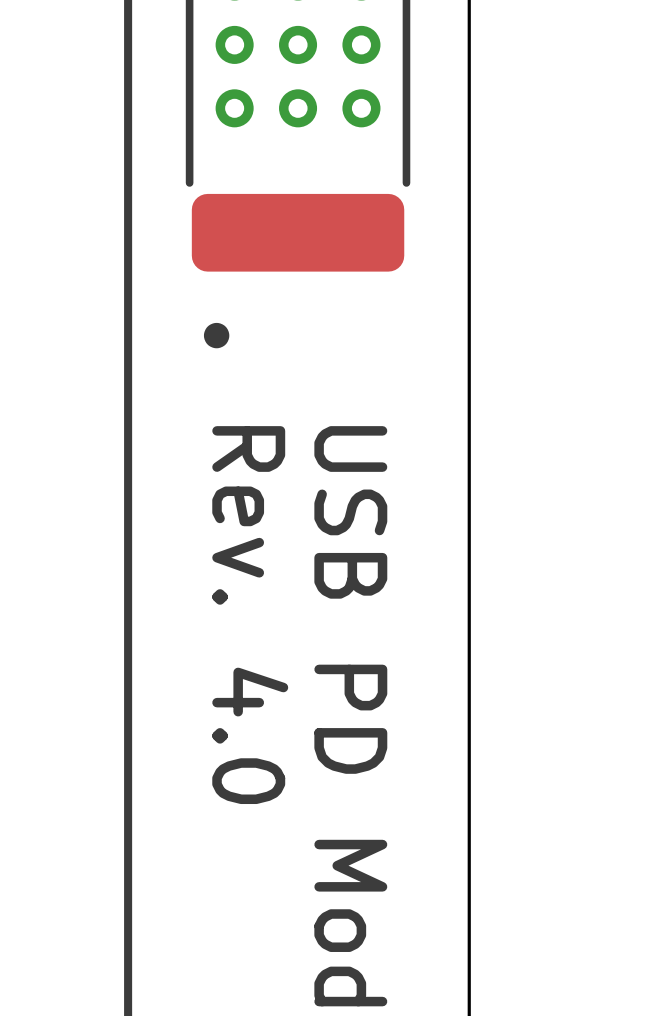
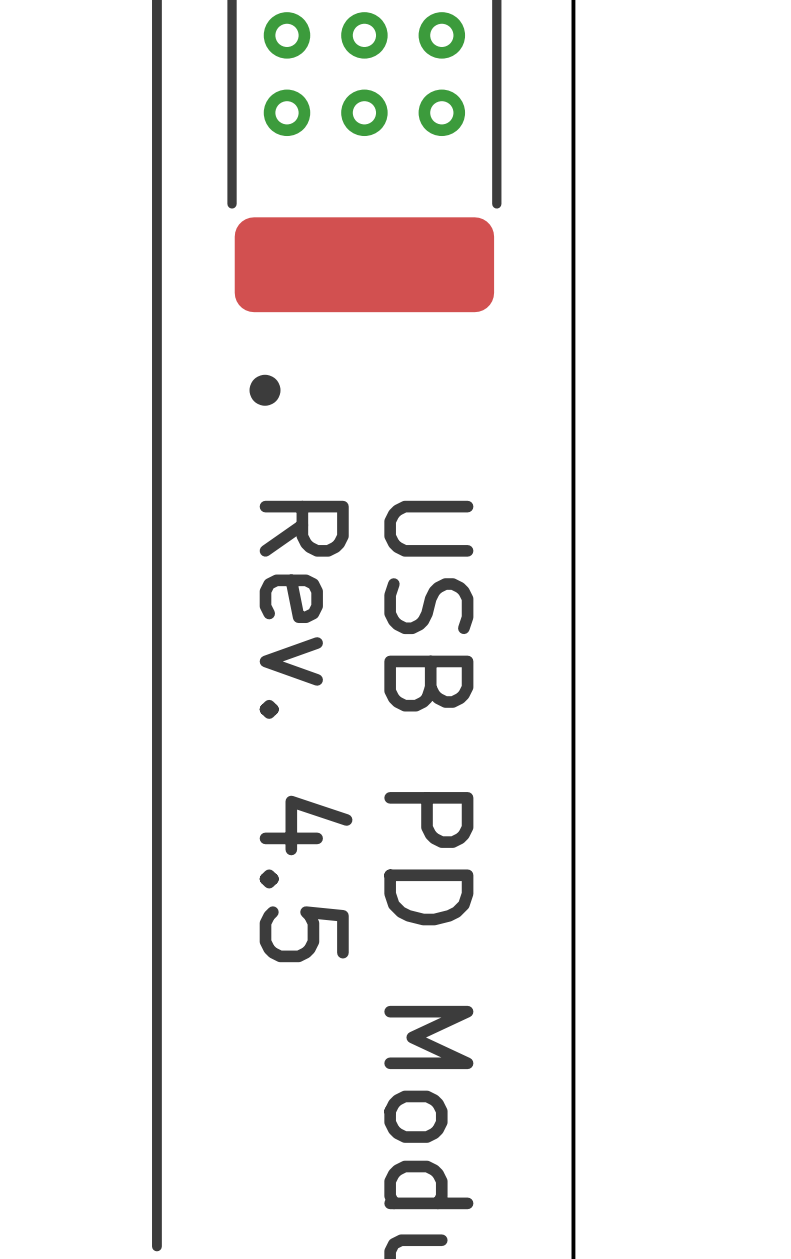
text: Rev. 4.0 (250, 615) -> Rev. 4.5 (306, 731)

